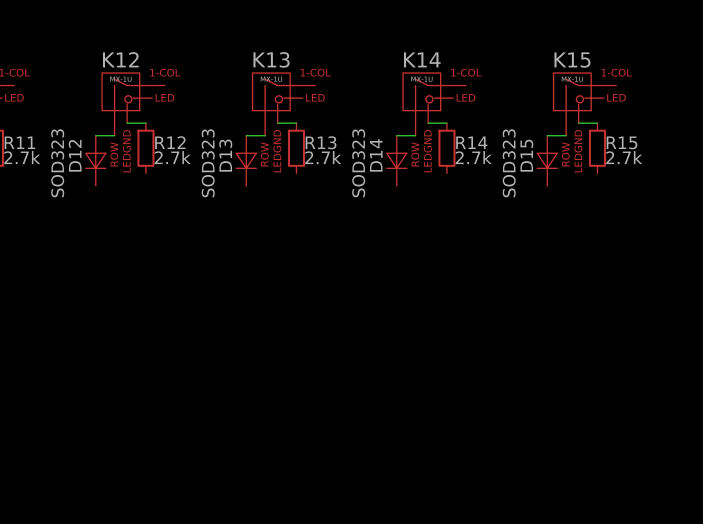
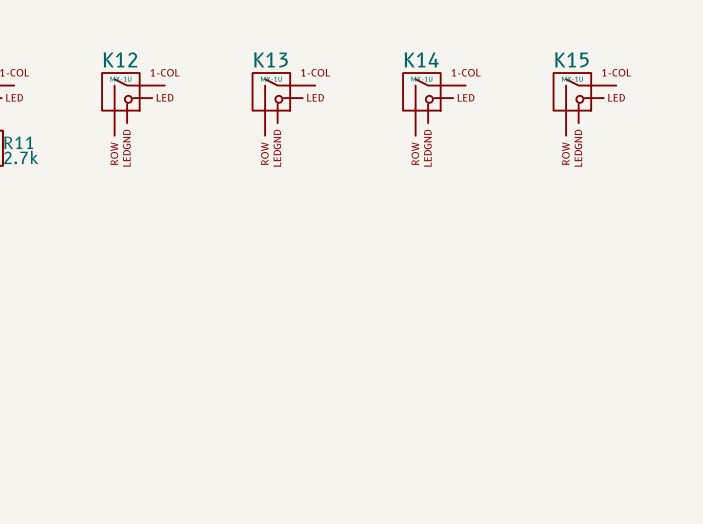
wire: (127, 123) (145, 123) -> none
wire: (277, 123) (296, 123) -> none
wire: (428, 123) (446, 123) -> none
wire: (578, 123) (597, 123) -> none
wire: (95, 135) (114, 135) -> none
wire: (246, 135) (265, 135) -> none
wire: (396, 135) (415, 135) -> none
wire: (547, 135) (566, 135) -> none
R12: 2.7k (145, 148) -> none
R13: 2.7k (296, 148) -> none
R14: 2.7k (446, 148) -> none
R15: 2.7k (597, 148) -> none
D12: SOD323 (95, 160) -> none
D13: SOD323 (246, 160) -> none
D14: SOD323 (396, 160) -> none
D15: SOD323 (547, 160) -> none

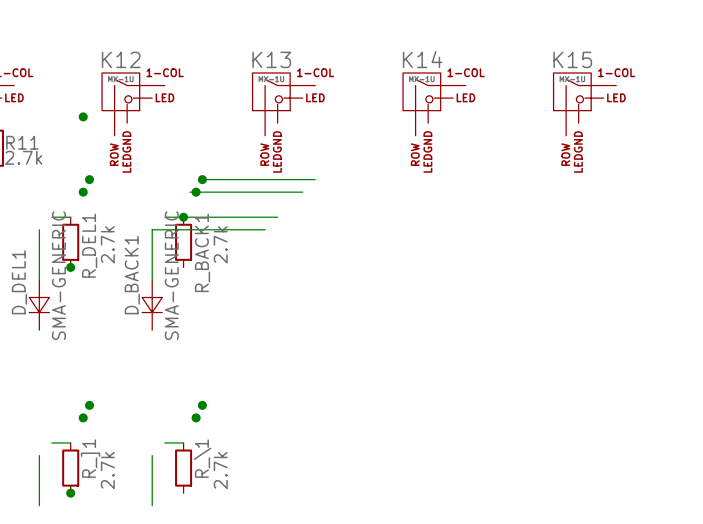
junction: none -> (83, 116)
junction: none -> (89, 179)
wire: none -> (202, 179) (315, 179)
junction: none -> (202, 179)
junction: none -> (83, 192)
wire: none -> (189, 192) (302, 192)
junction: none -> (196, 192)
wire: none -> (51, 217) (70, 217)
wire: none -> (164, 217) (277, 217)
junction: none -> (183, 217)
wire: none -> (39, 229) (39, 279)
wire: none -> (265, 229) (152, 229) (152, 279)
R_DEL1: none -> 2.7k (70, 242)
R_BACK1: none -> 2.7k (183, 242)
junction: none -> (70, 267)
D_DEL1: none -> SMA-GENERIC (39, 305)
D_BACK1: none -> SMA-GENERIC (152, 305)
junction: none -> (89, 405)
junction: none -> (202, 405)
junction: none -> (83, 417)
junction: none -> (196, 417)
wire: none -> (51, 442) (70, 442)
wire: none -> (164, 442) (183, 442)
wire: none -> (39, 455) (39, 505)
wire: none -> (152, 455) (152, 505)
R_]1: none -> 2.7k (70, 468)
R_\1: none -> 2.7k (183, 468)
junction: none -> (70, 493)

